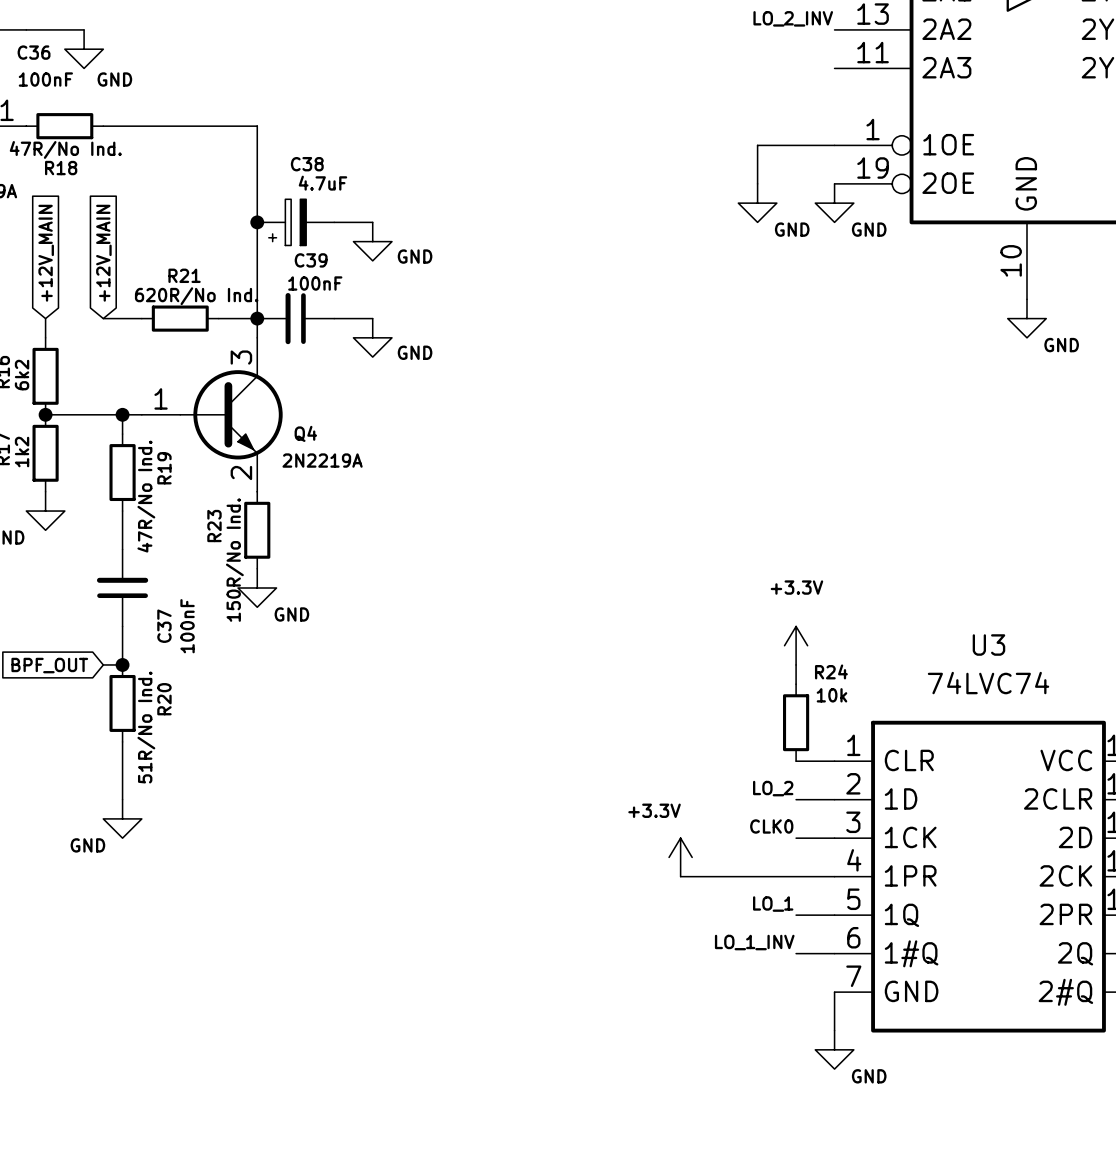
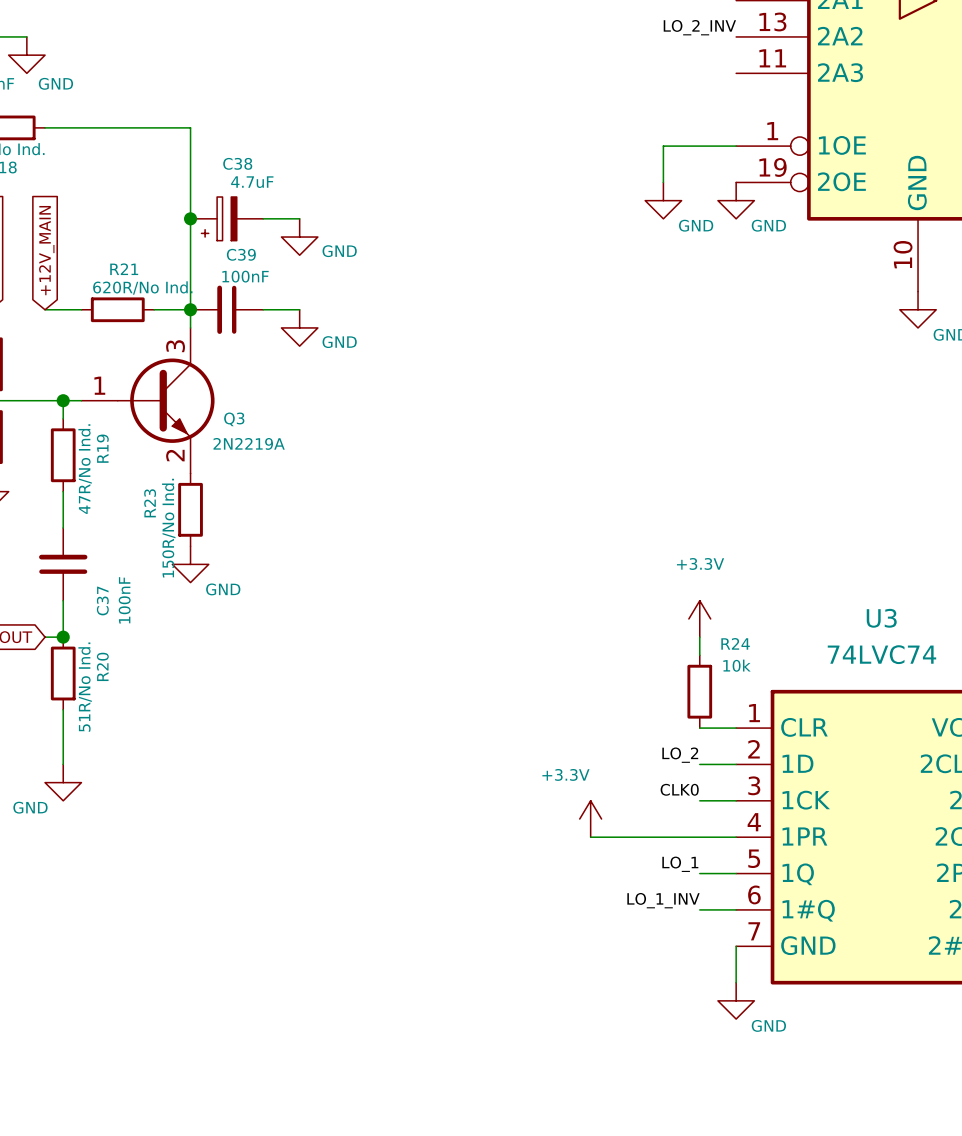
Q4 name: Q4 (305, 433) -> Q3 (234, 419)

